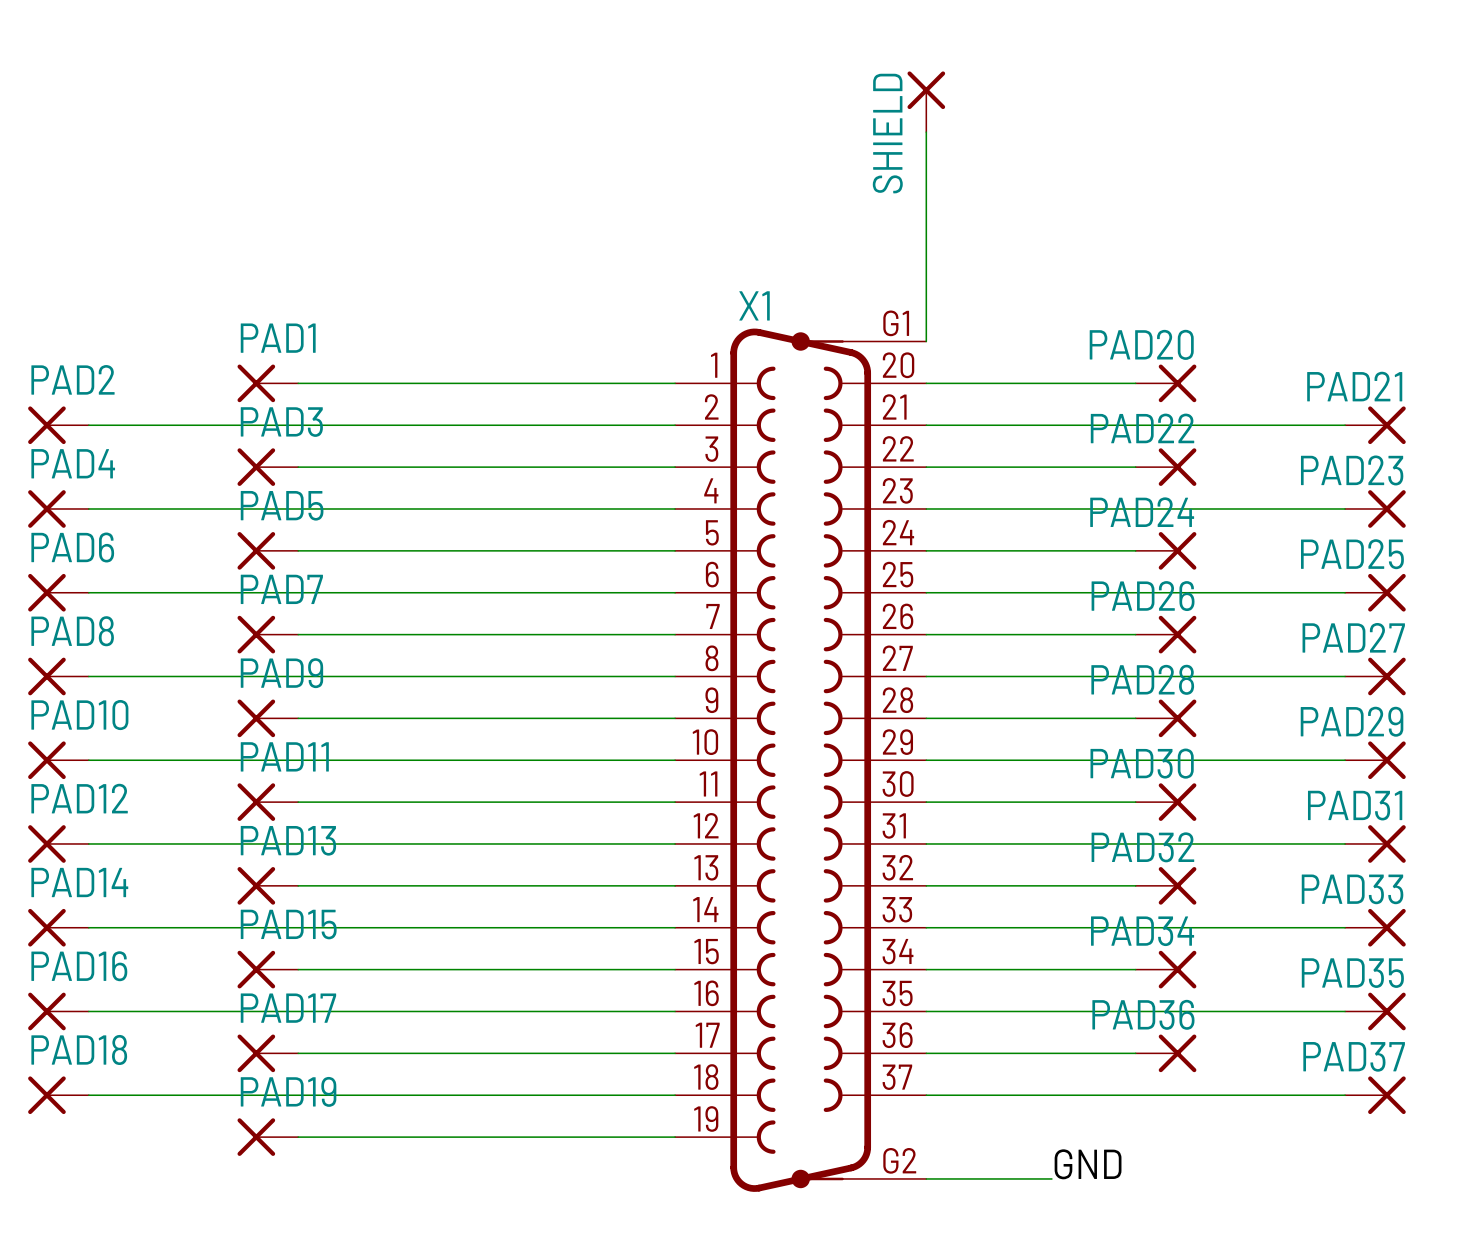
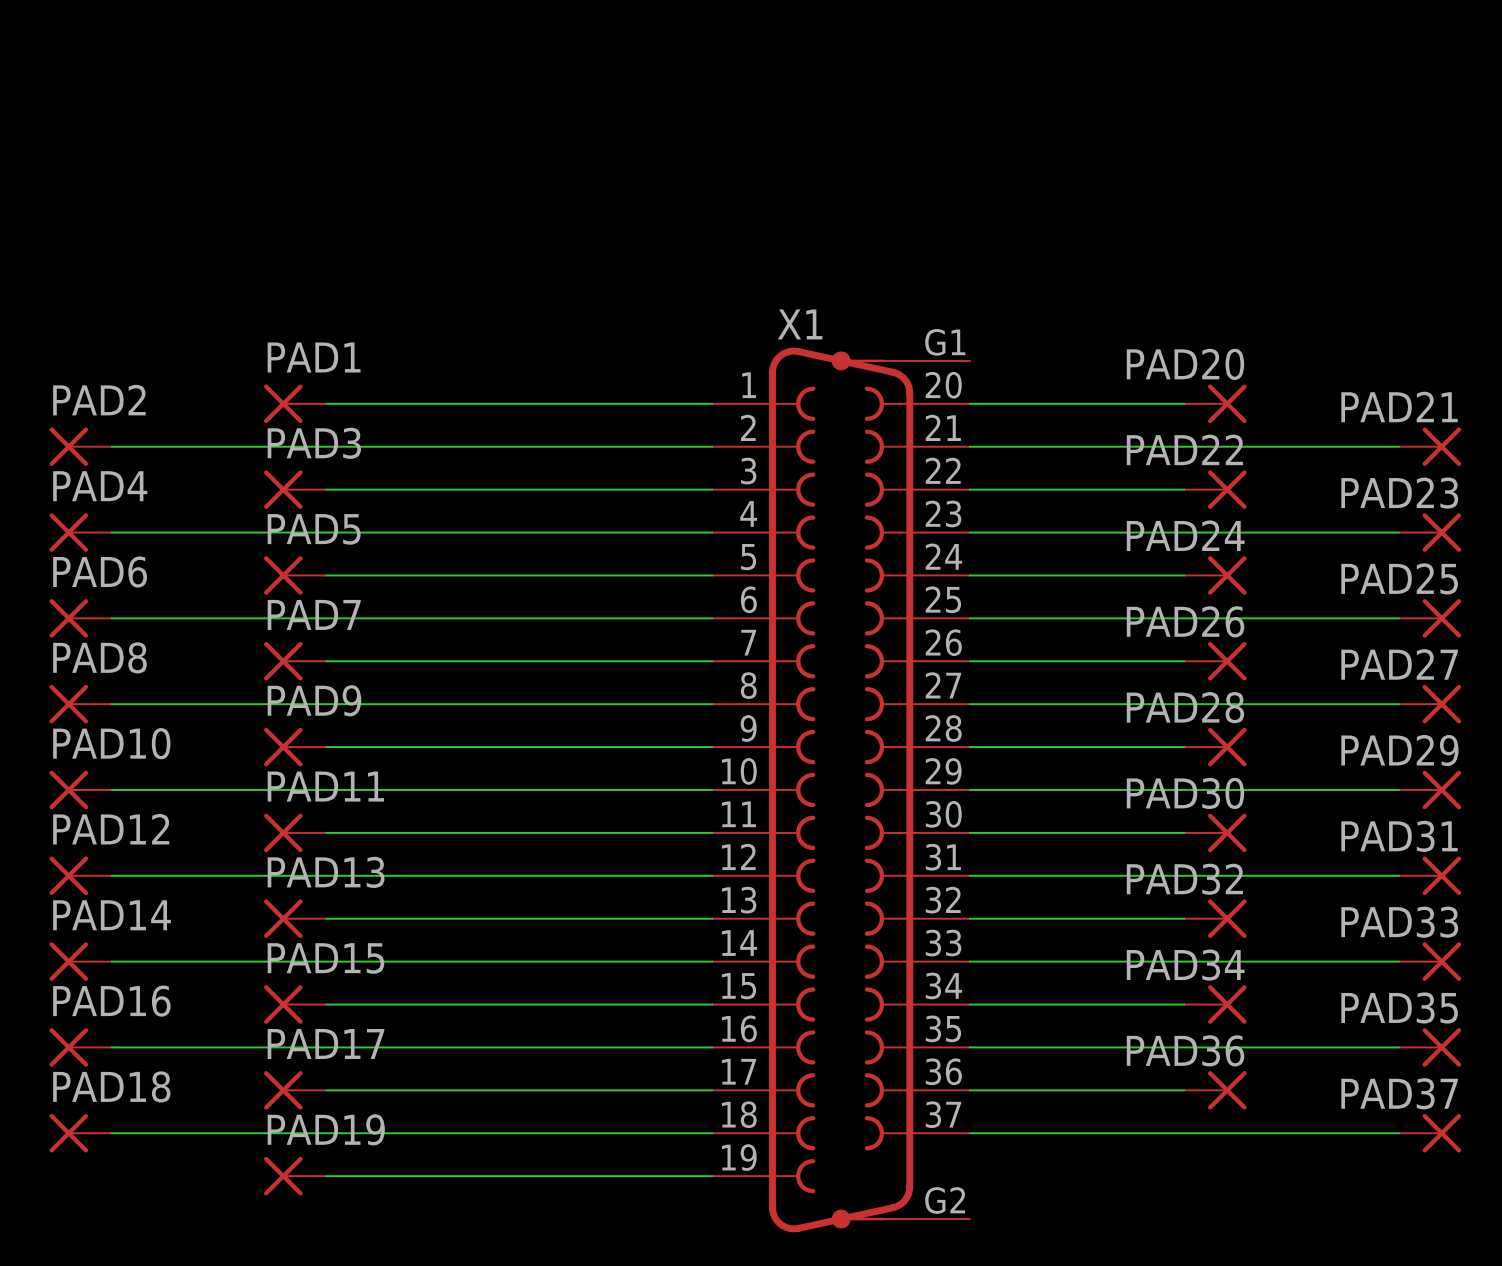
SHIELD: (926, 101) -> none
wire: (926, 132) (926, 341) -> none
label: GND (1088, 1164) -> none
wire: (926, 1178) (1051, 1178) -> none

